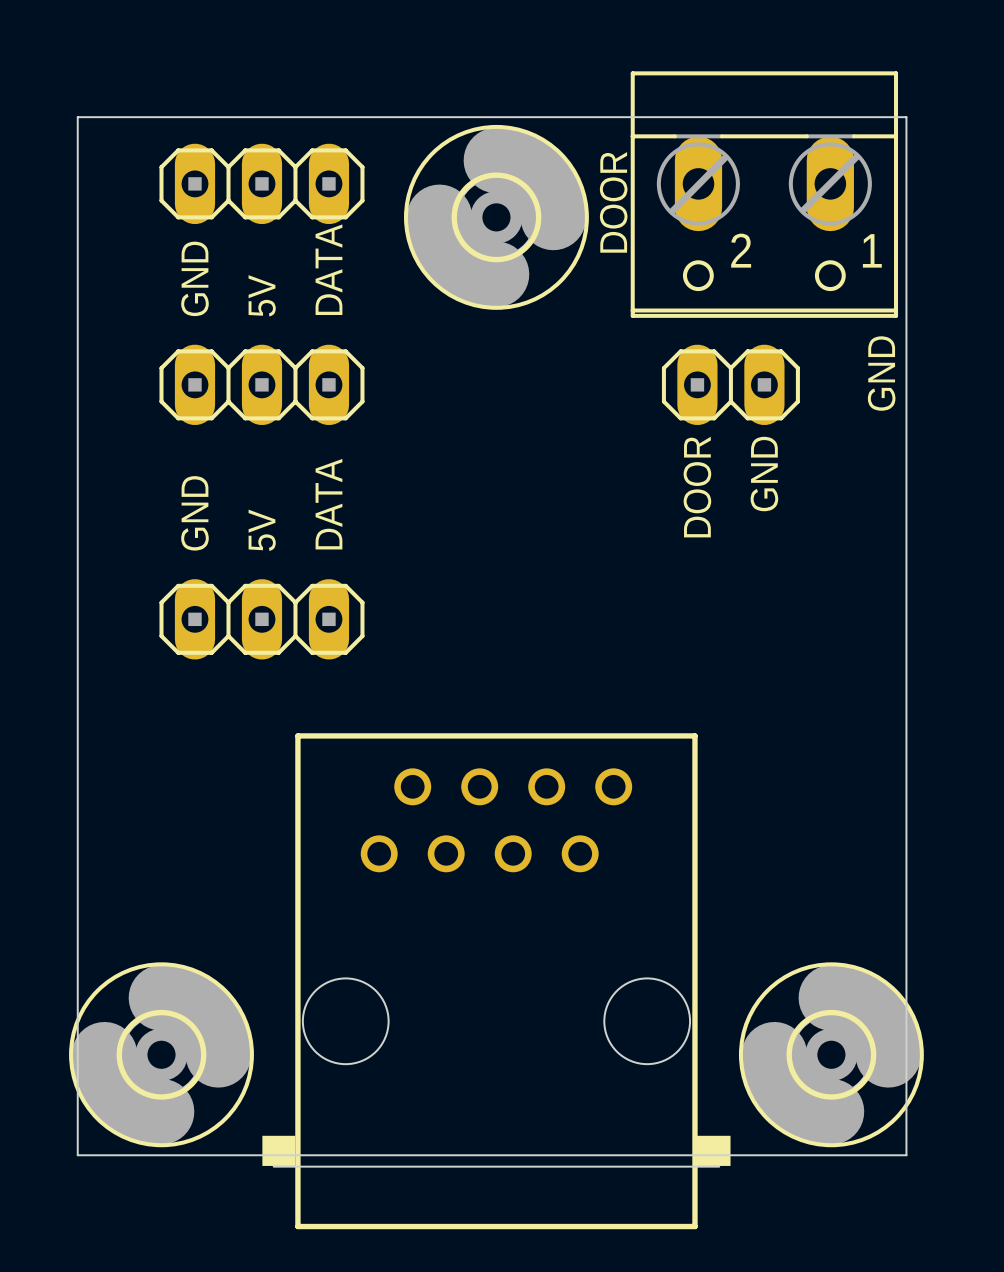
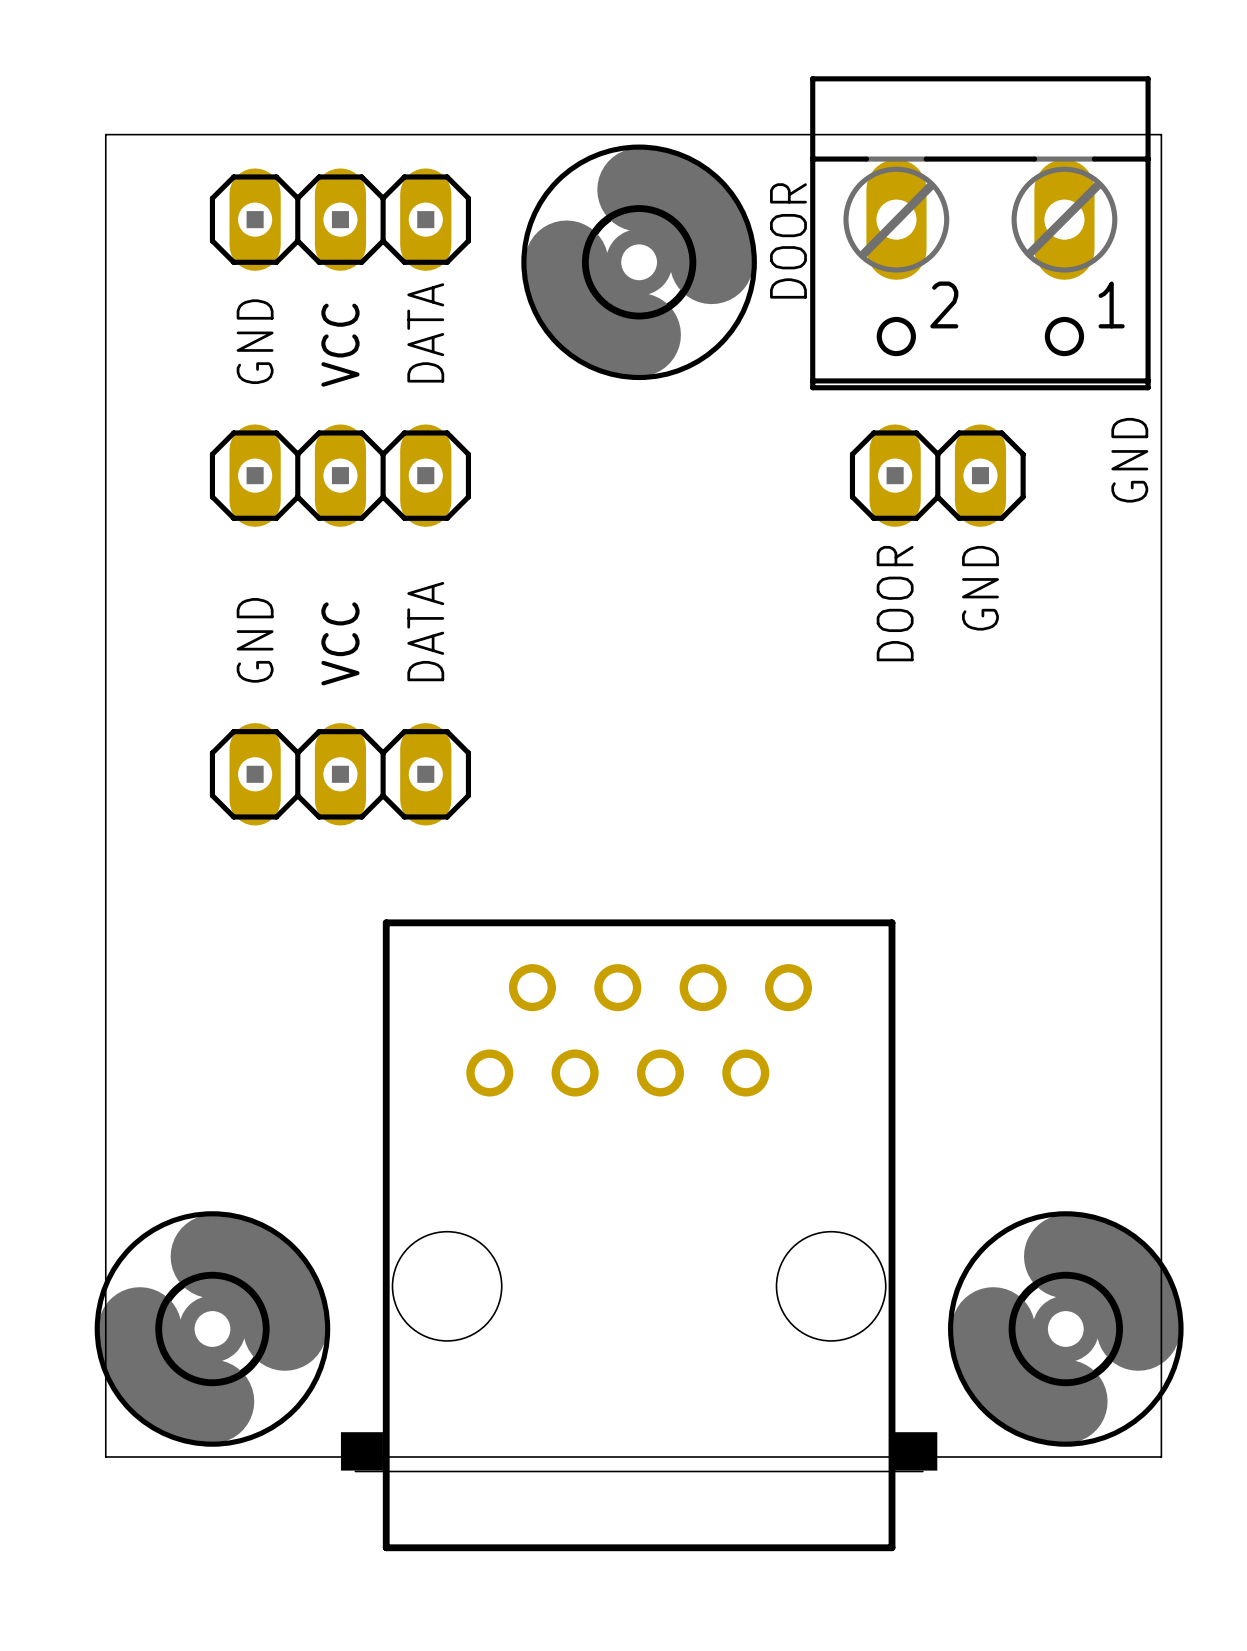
text: 5V (262, 295) -> VCC (340, 345)
text: 5V (262, 530) -> VCC (340, 643)

